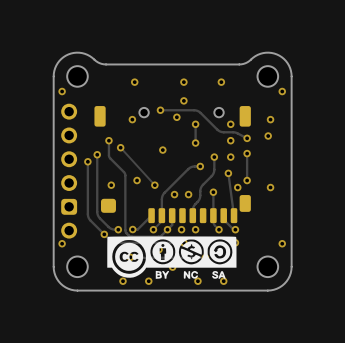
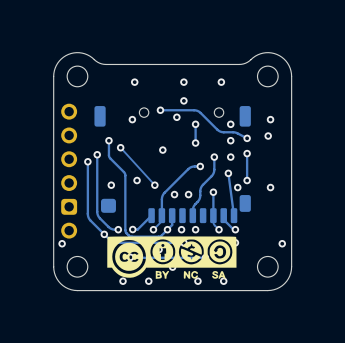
via: (62, 91) -> none
via: (282, 91) -> none

